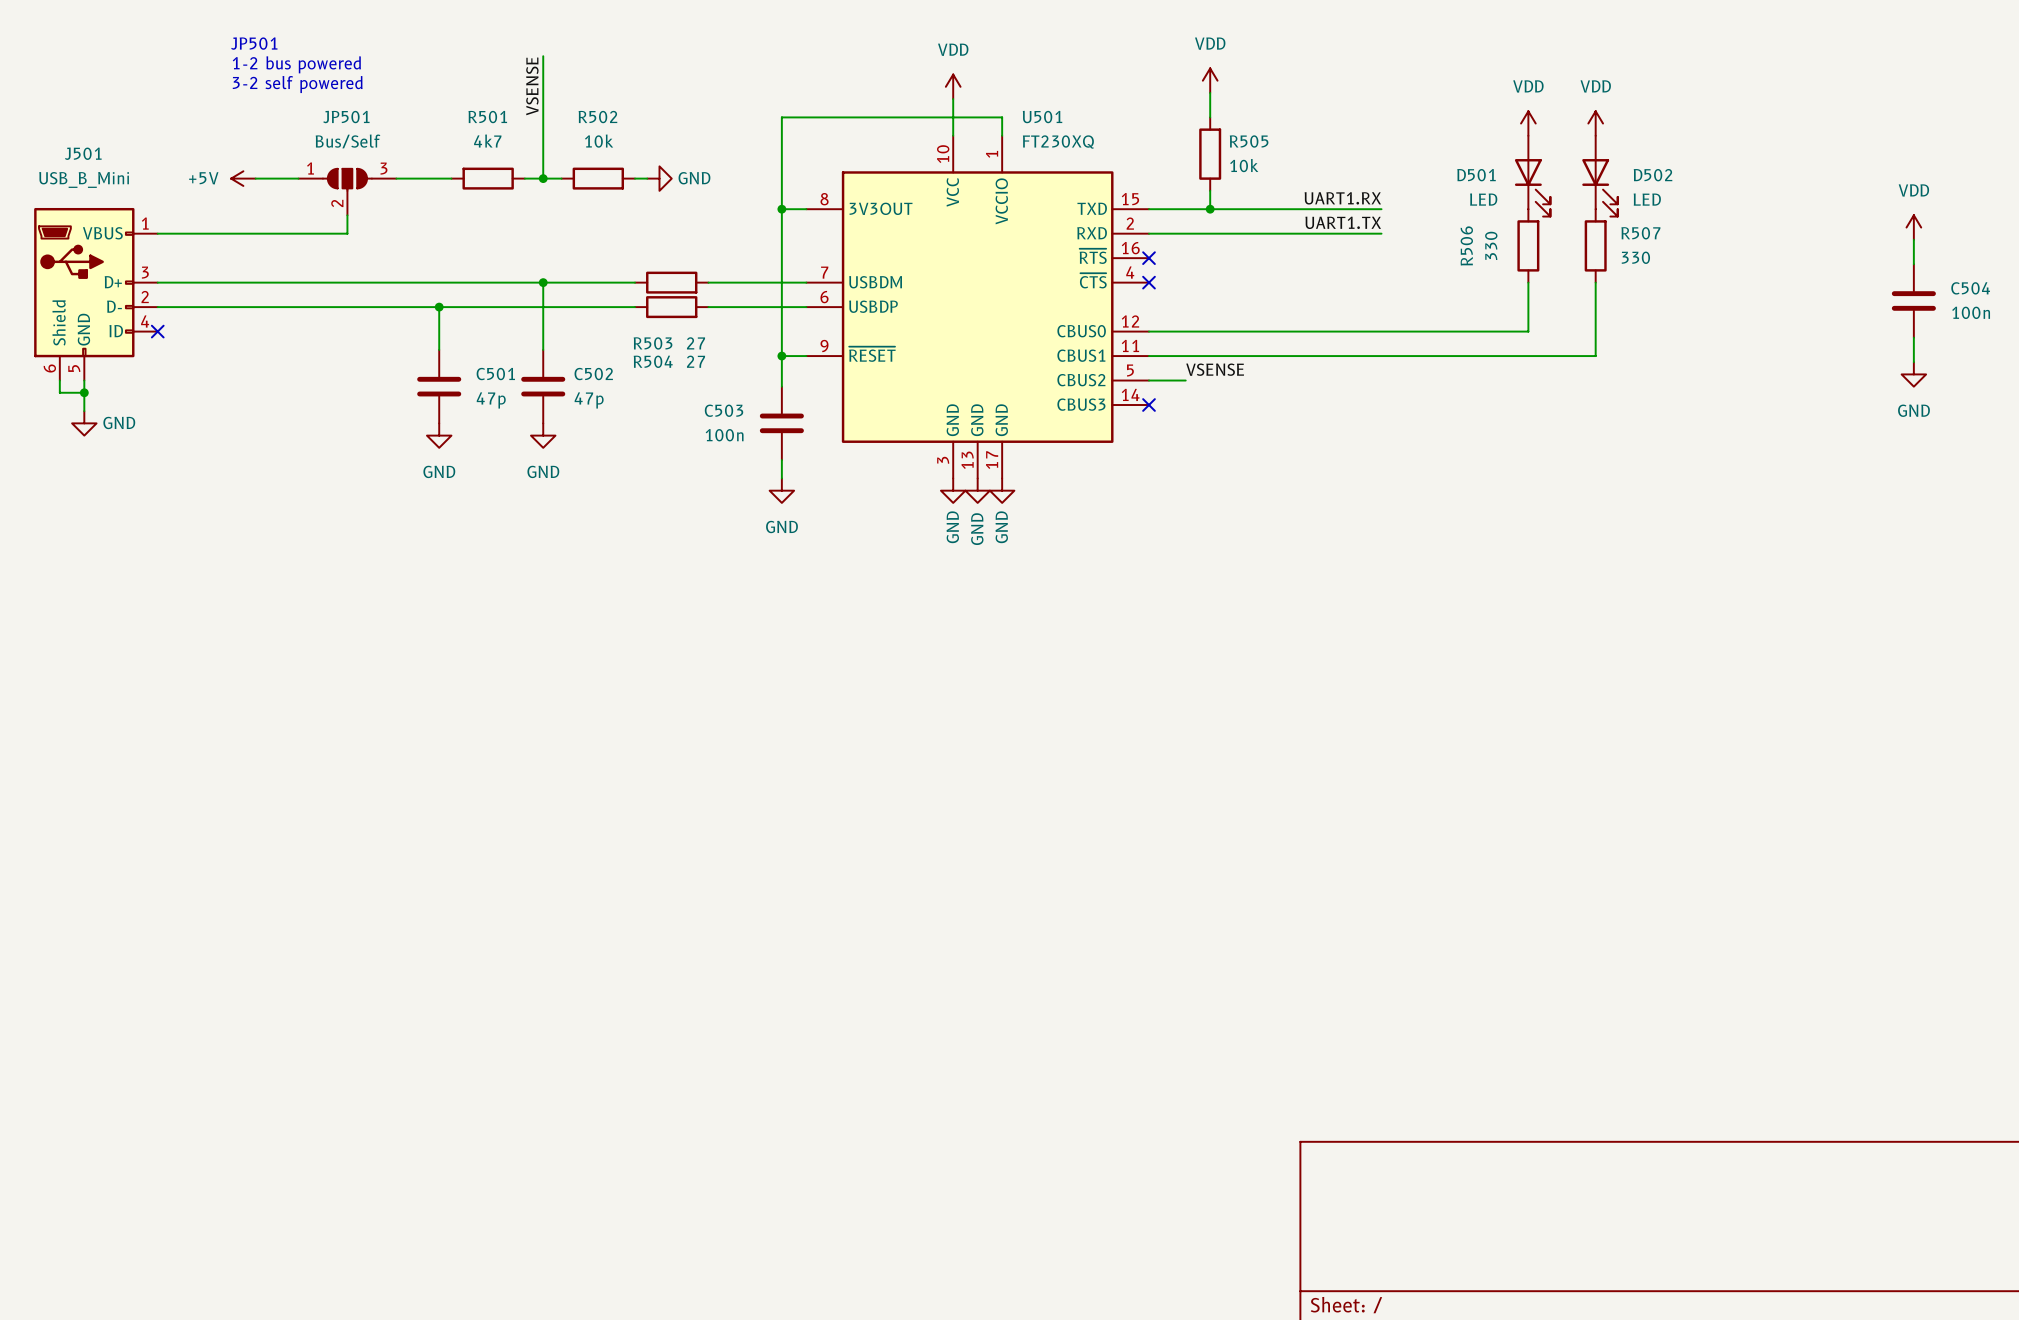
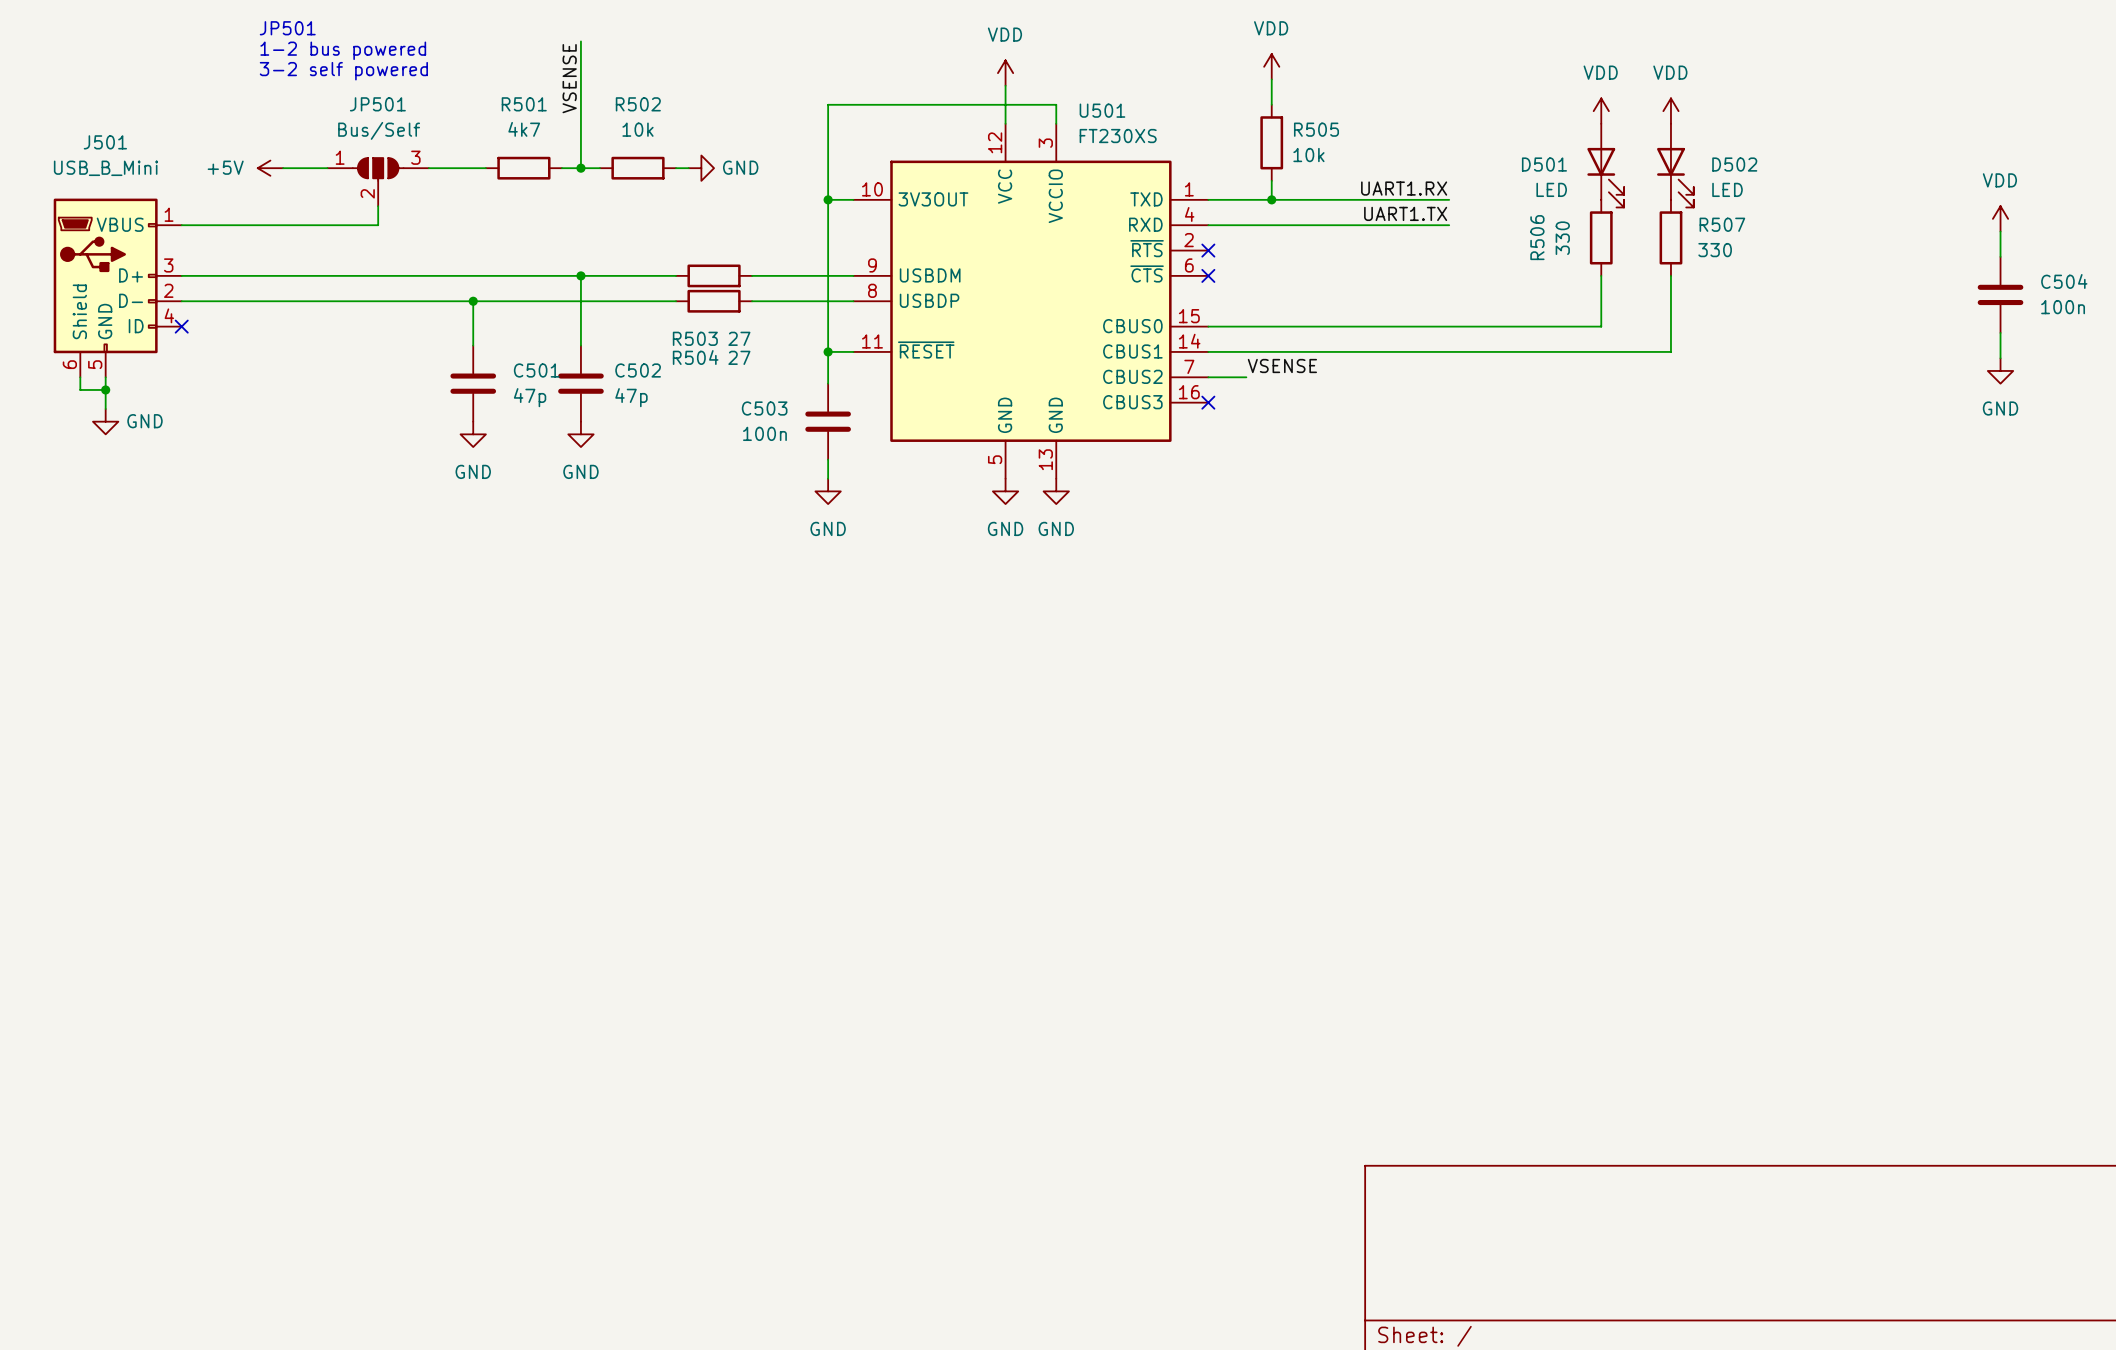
U501 symbol: [806, 135, 1150, 479] -> [853, 123, 1209, 479]
U501 value: FT230XQ (1058, 142) -> FT230XS (1118, 136)
power symbol: GND (977, 490) -> none
power symbol text rotation: 0° (952, 527) -> 90° clockwise (1005, 528)
power symbol text rotation: 0° (1001, 527) -> 90° clockwise (1056, 528)

